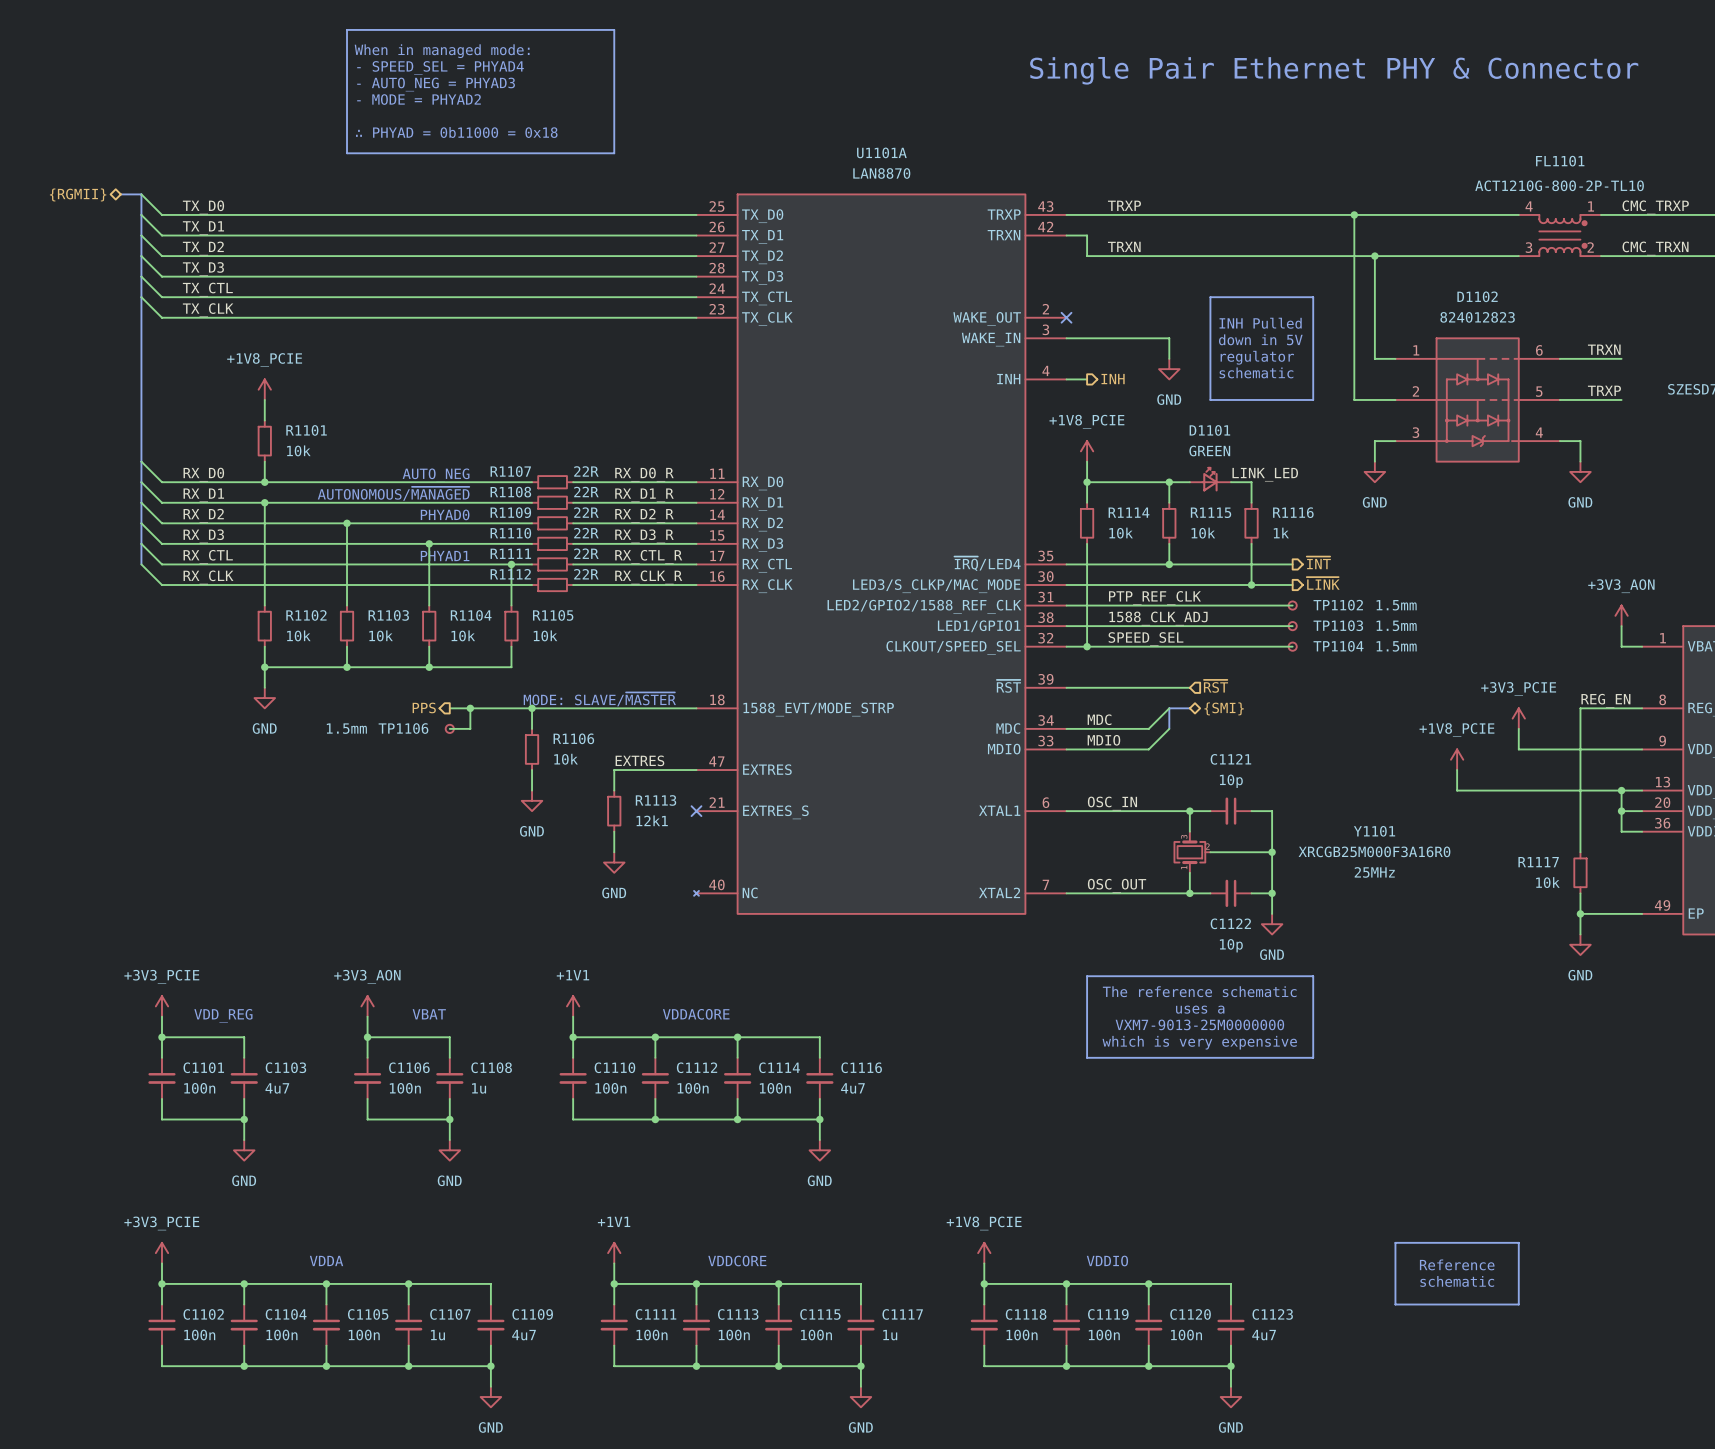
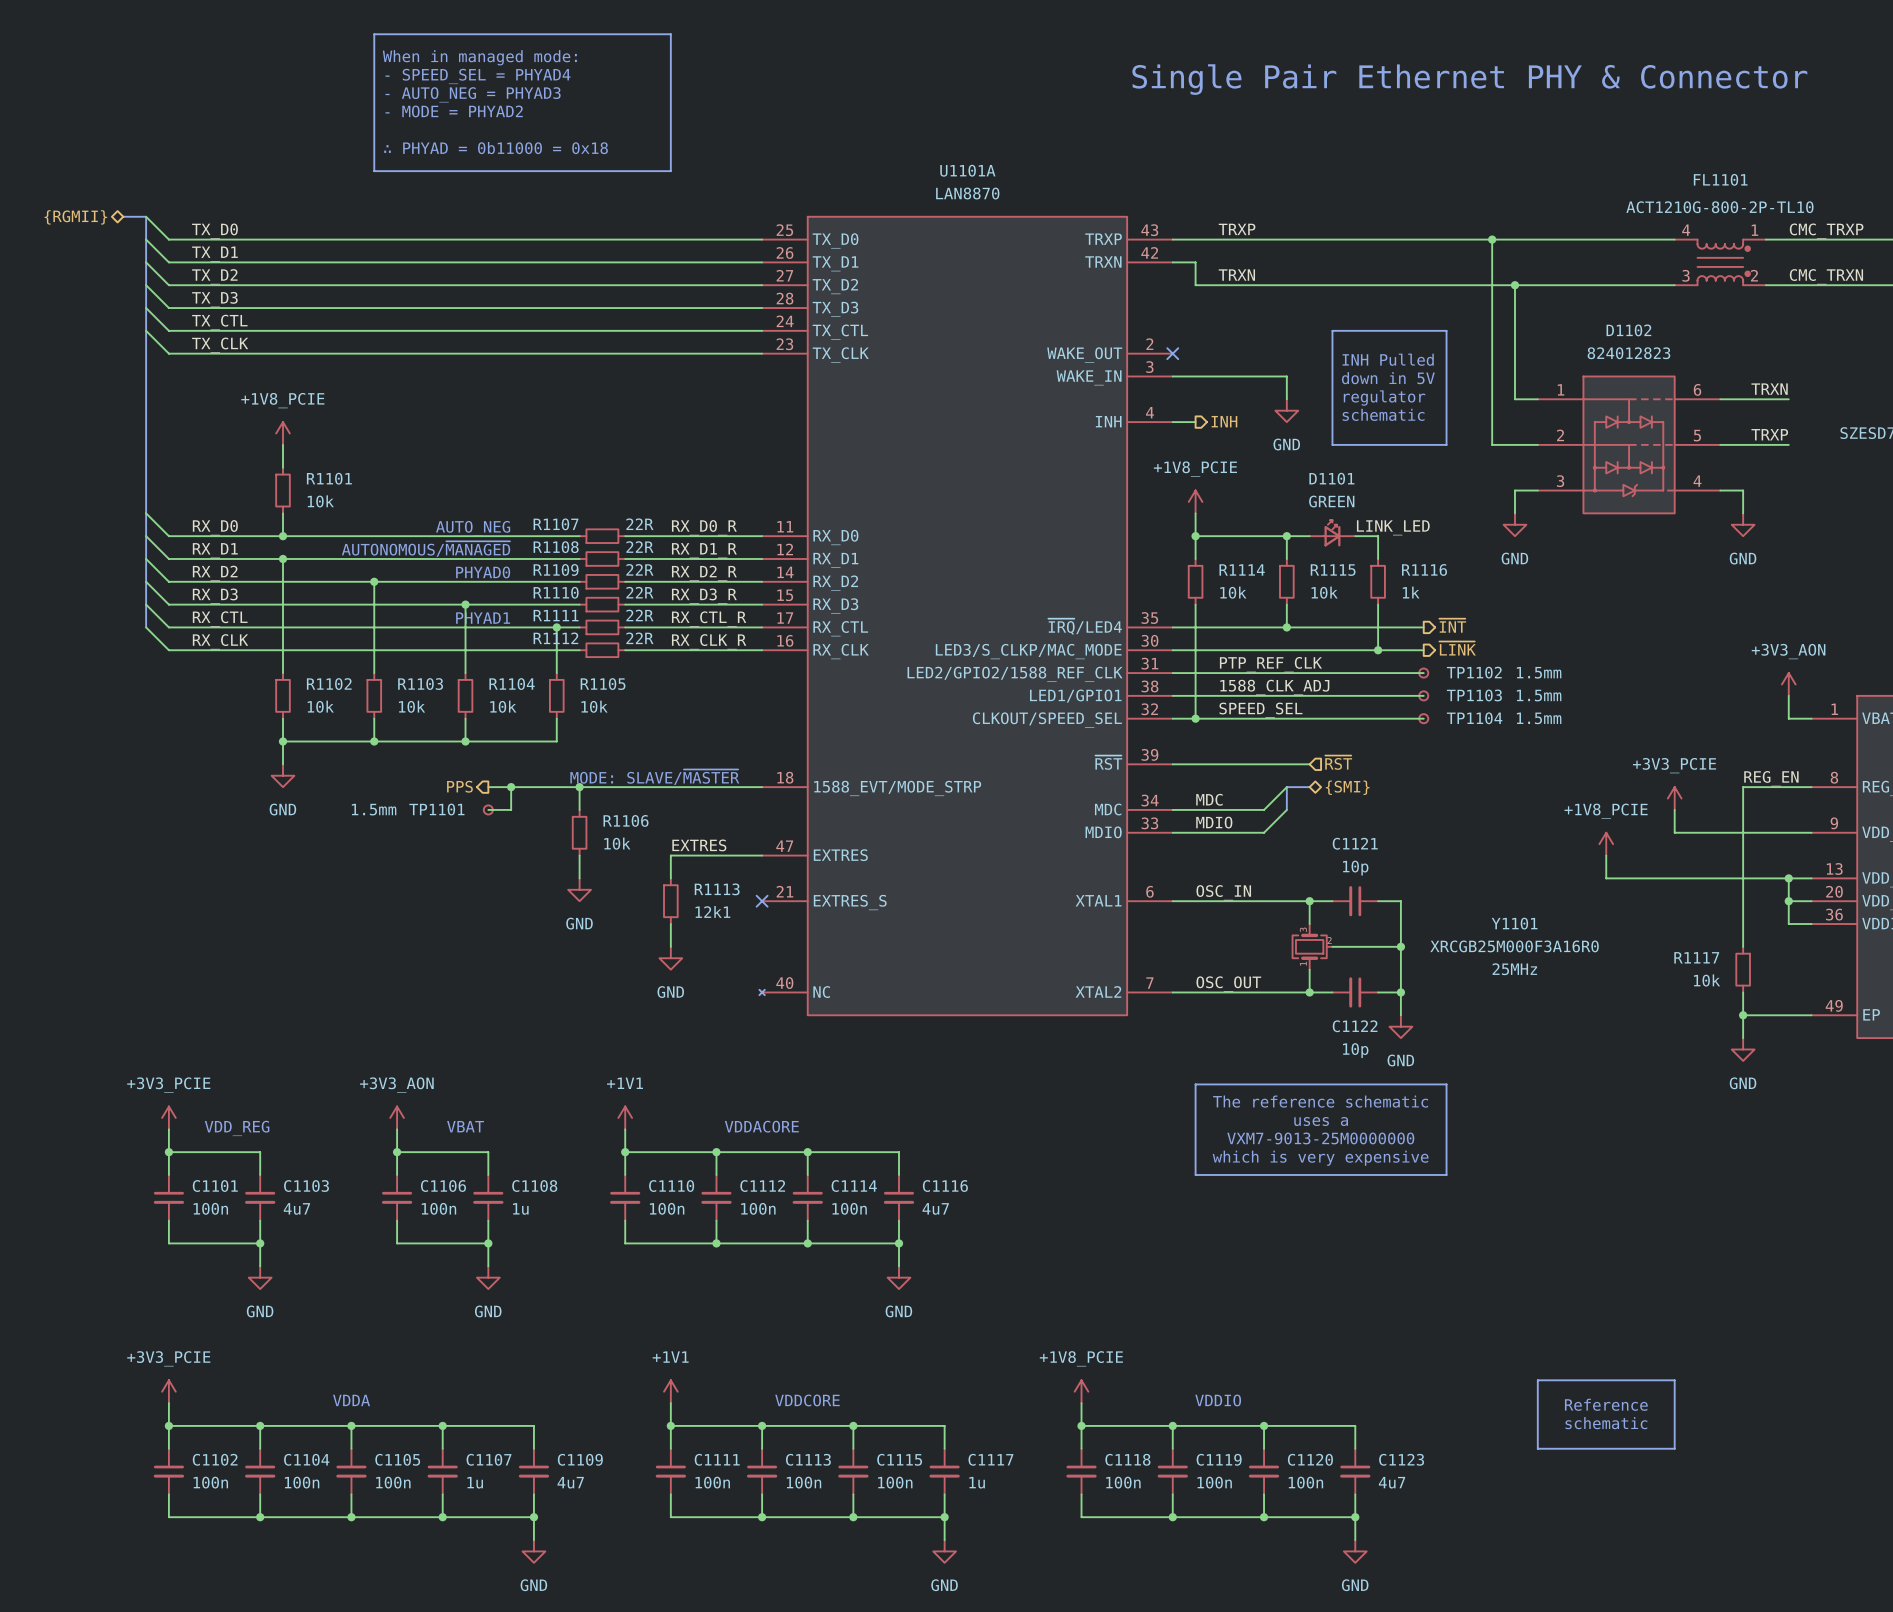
TP1106 name: TP1106 (403, 728) -> TP1101 (436, 809)

